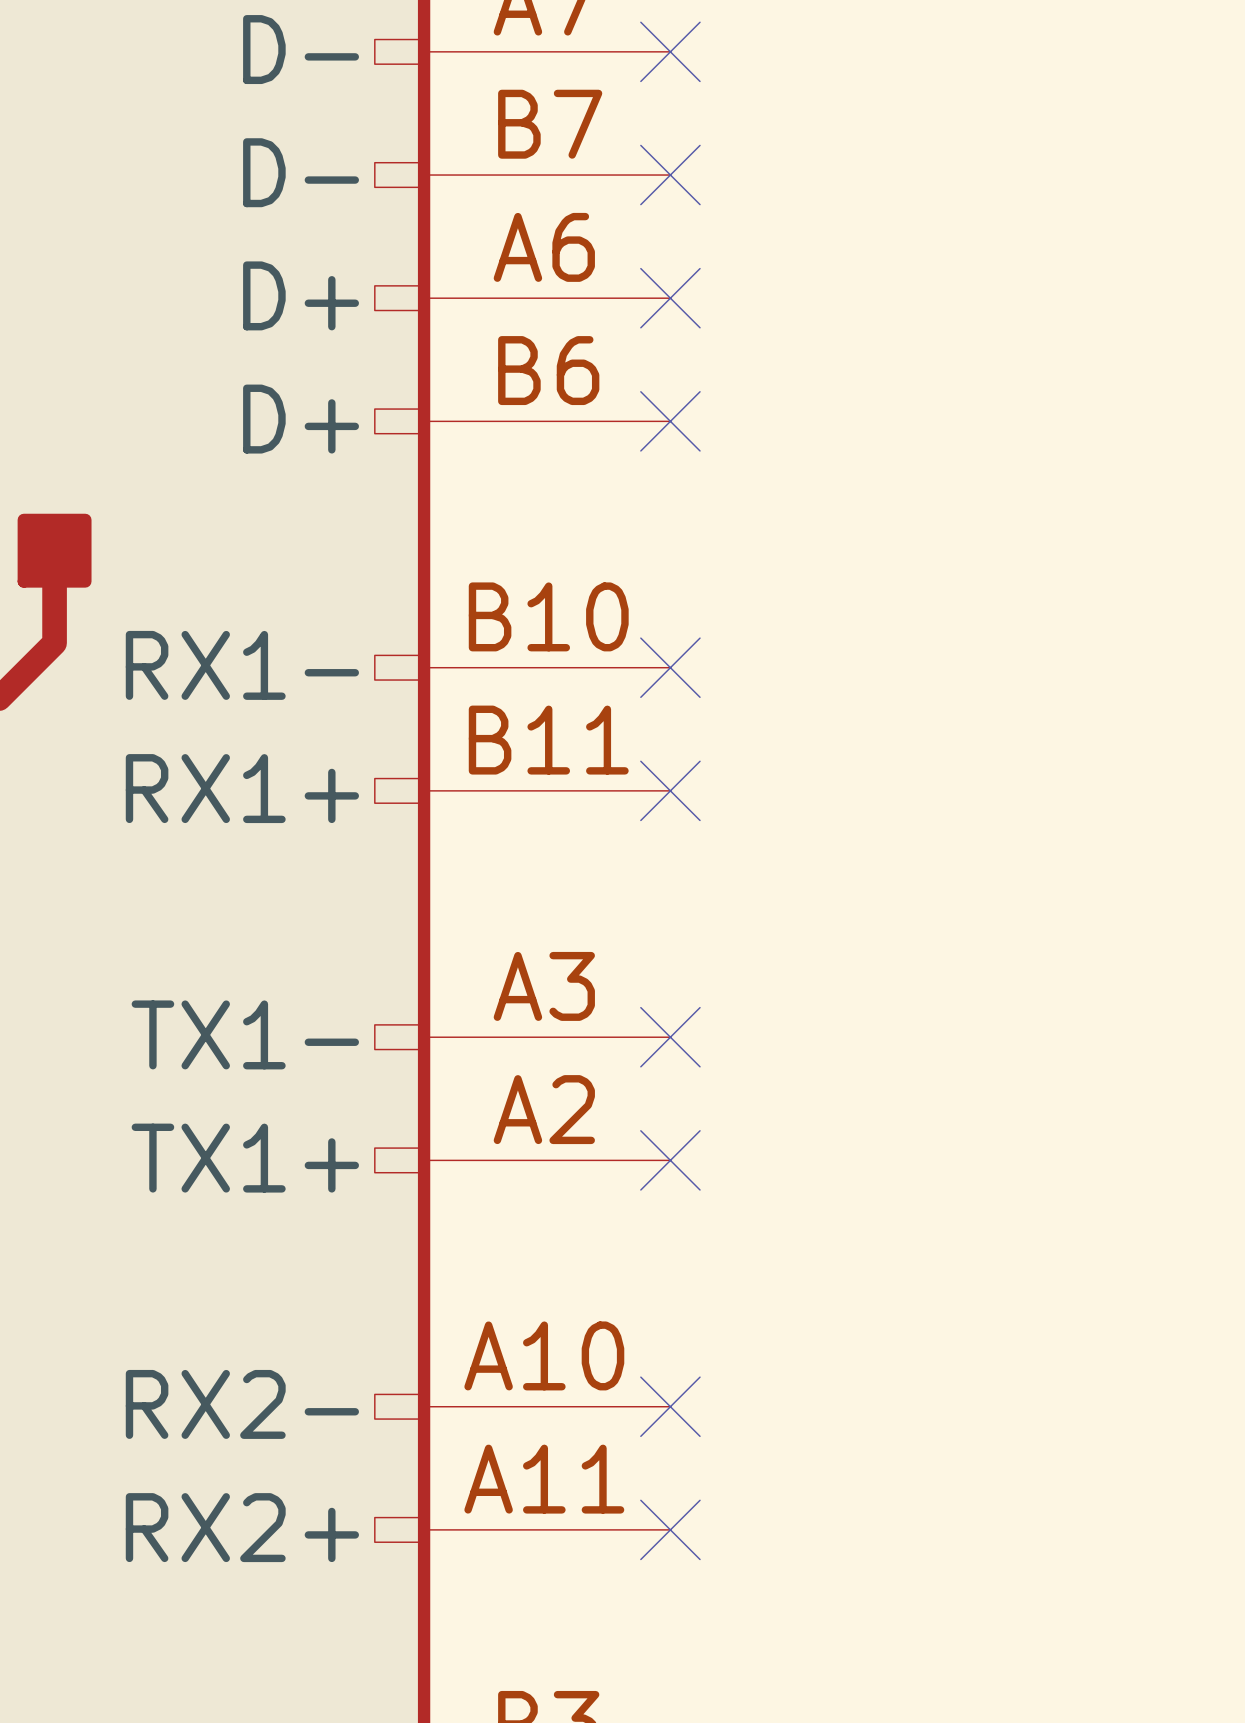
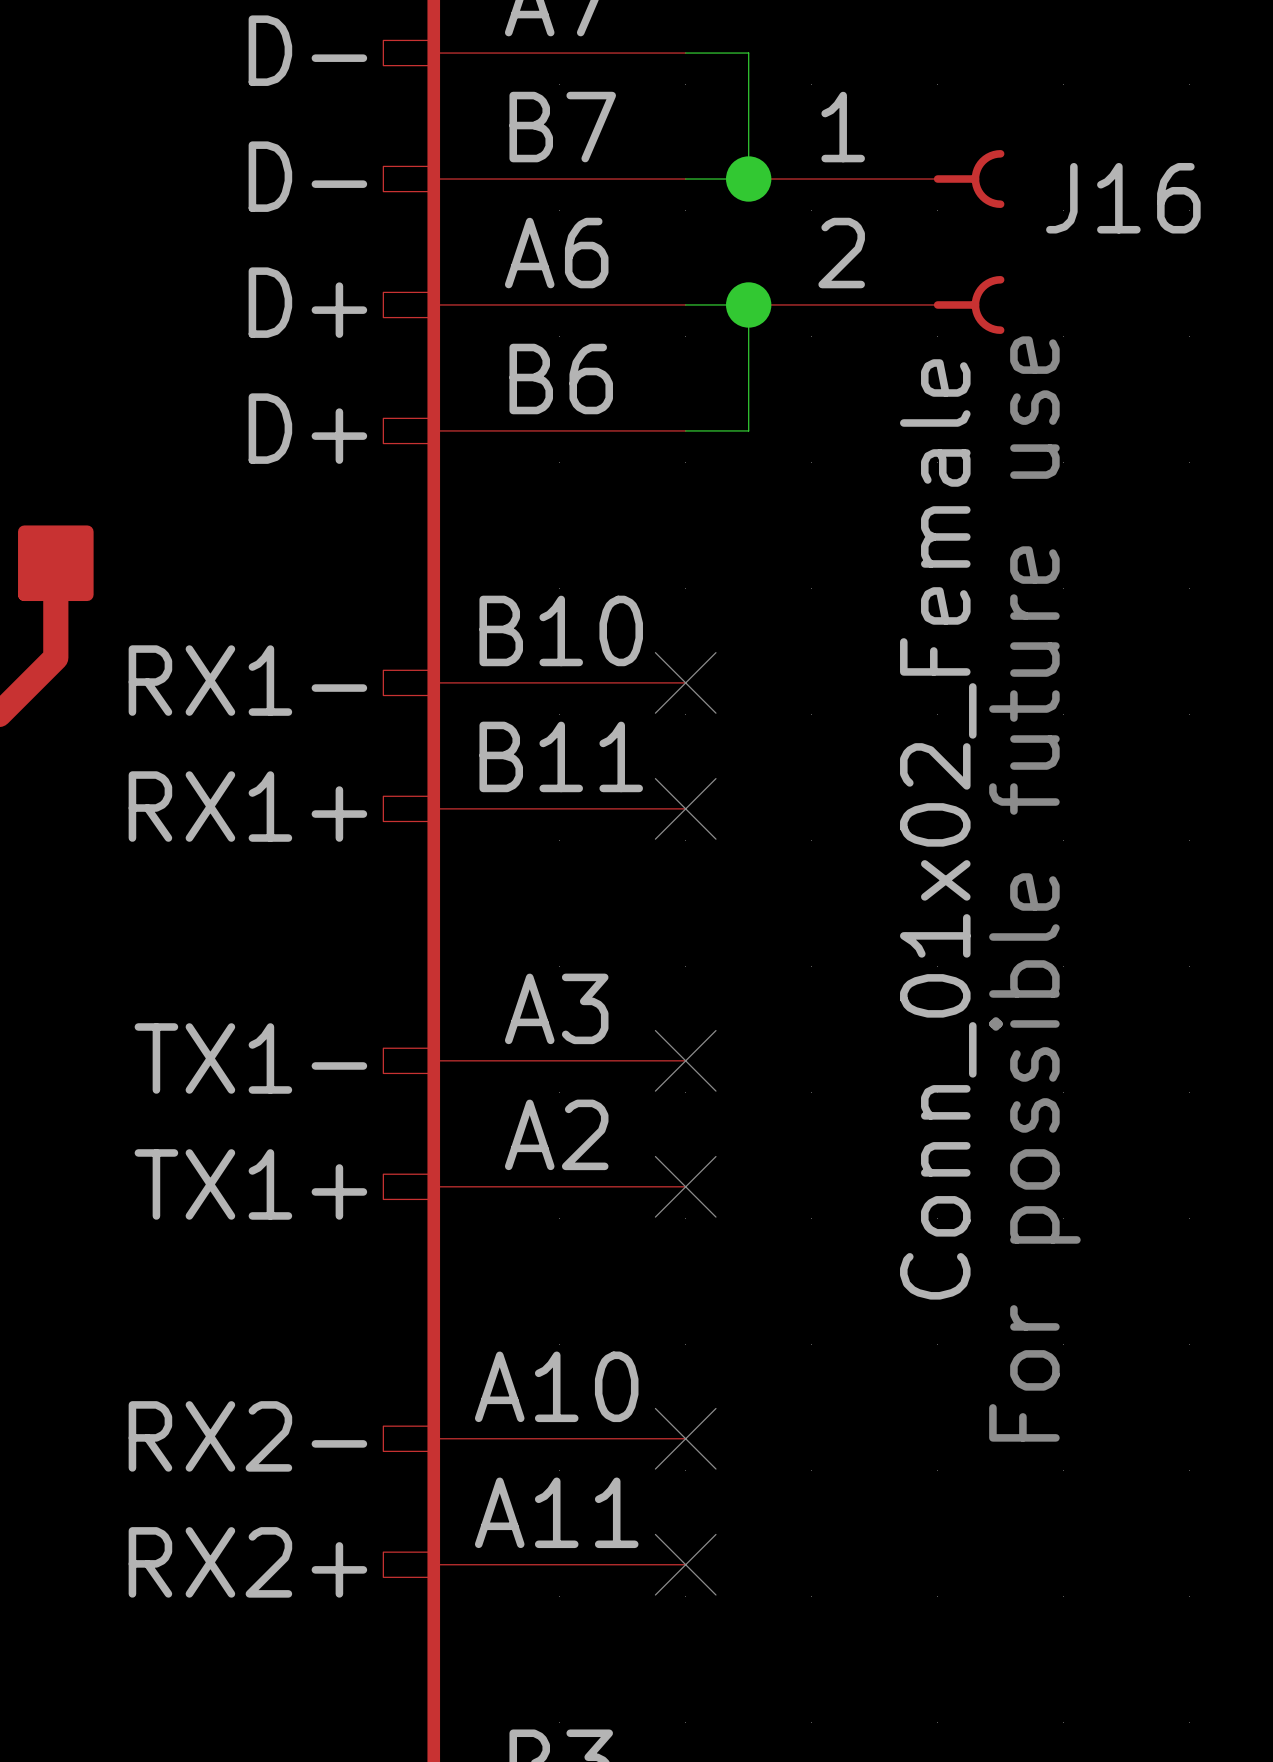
wire: none -> (685, 53) (748, 53) (748, 179) (685, 179)
no-connect mark: (670, 51) -> none
no-connect mark: (670, 175) -> none
junction: none -> (748, 179)
J16: none -> Conn_01x02_Female (876, 241)
wire: none -> (685, 304) (748, 304) (748, 430) (685, 430)
no-connect mark: (670, 298) -> none
junction: none -> (748, 304)
no-connect mark: (670, 421) -> none
text: none -> For possible future use (1034, 888)

